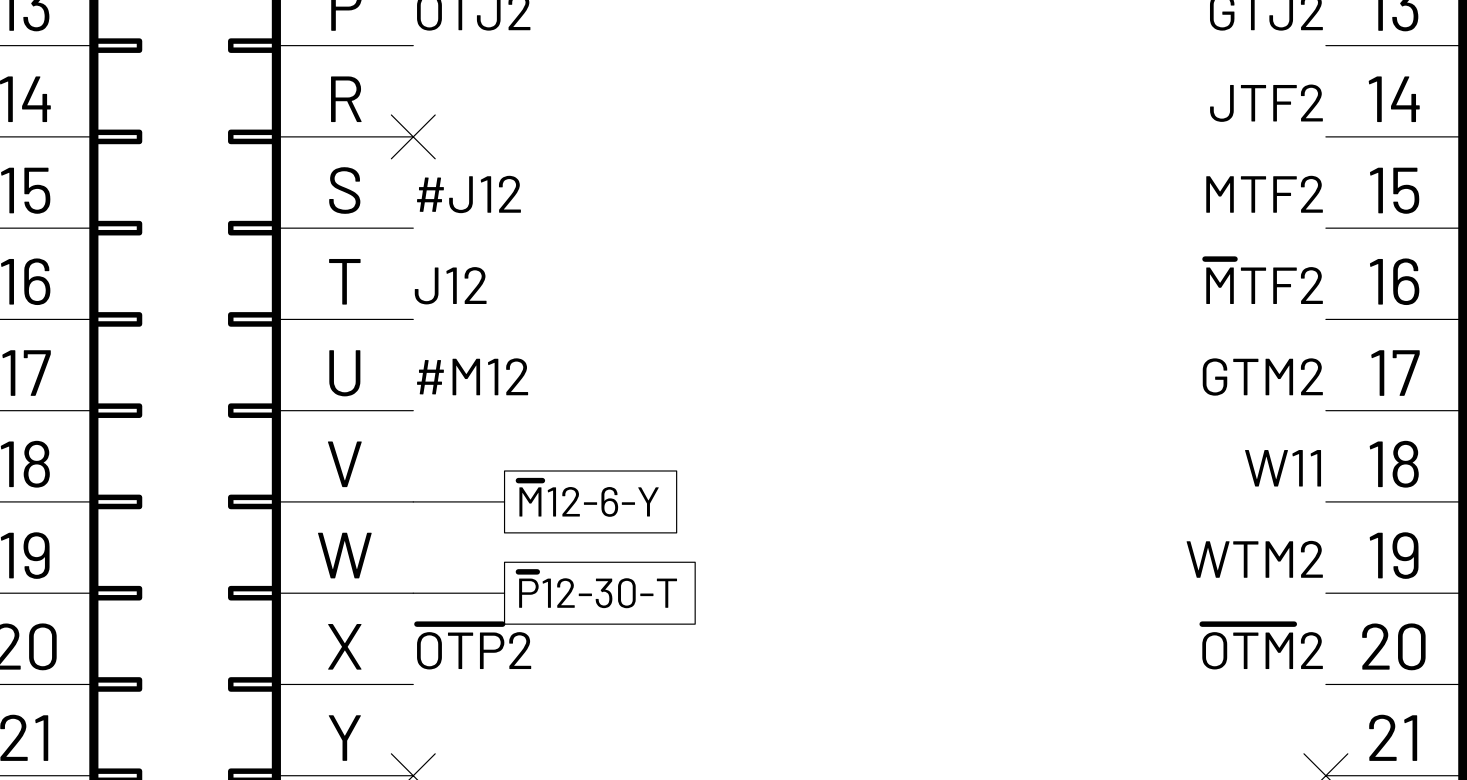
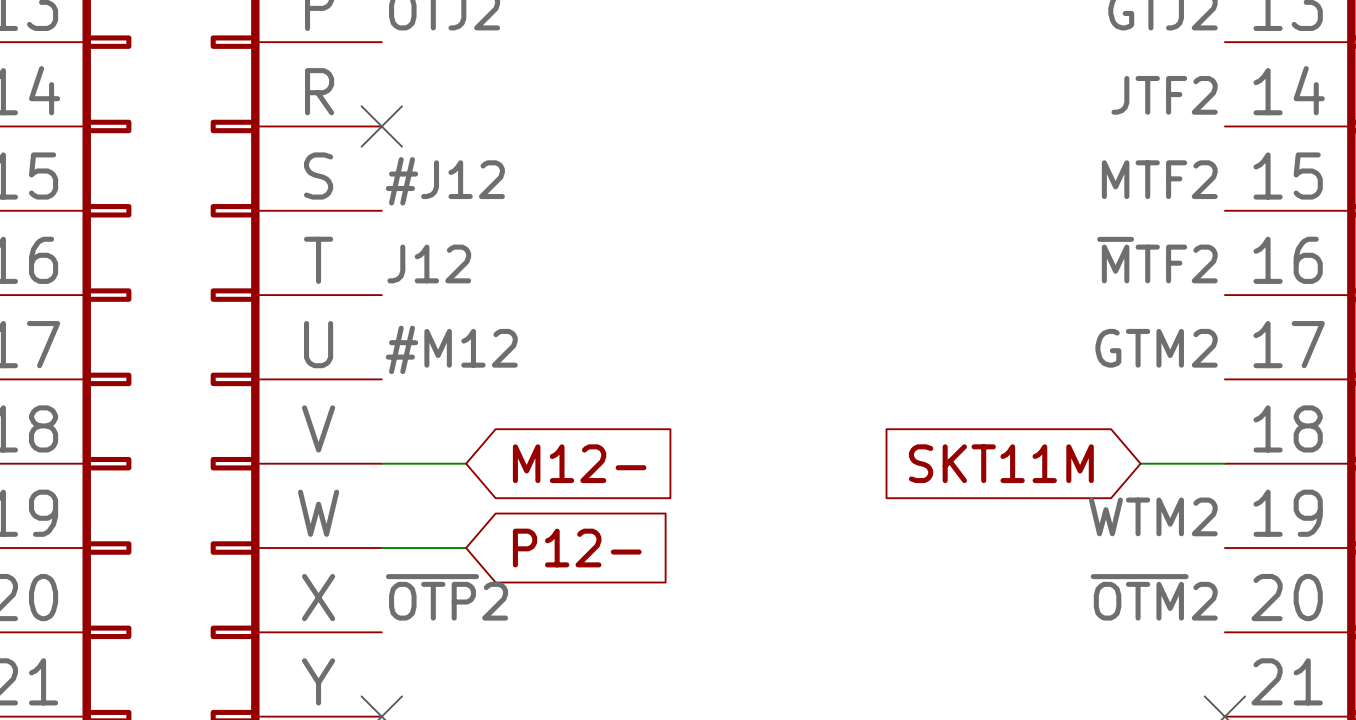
label: W11 (1283, 468) -> none
global label shape: passive (588, 498) -> input (579, 463)
global label: ~{M}12-6-Y (588, 498) -> M12- (579, 463)
global label: none -> SKT11M (1001, 463)
wire: none -> (1140, 463) (1224, 463)
global label shape: passive (597, 590) -> input (577, 548)
global label: ~{P}12-30-T (597, 590) -> P12- (577, 548)

